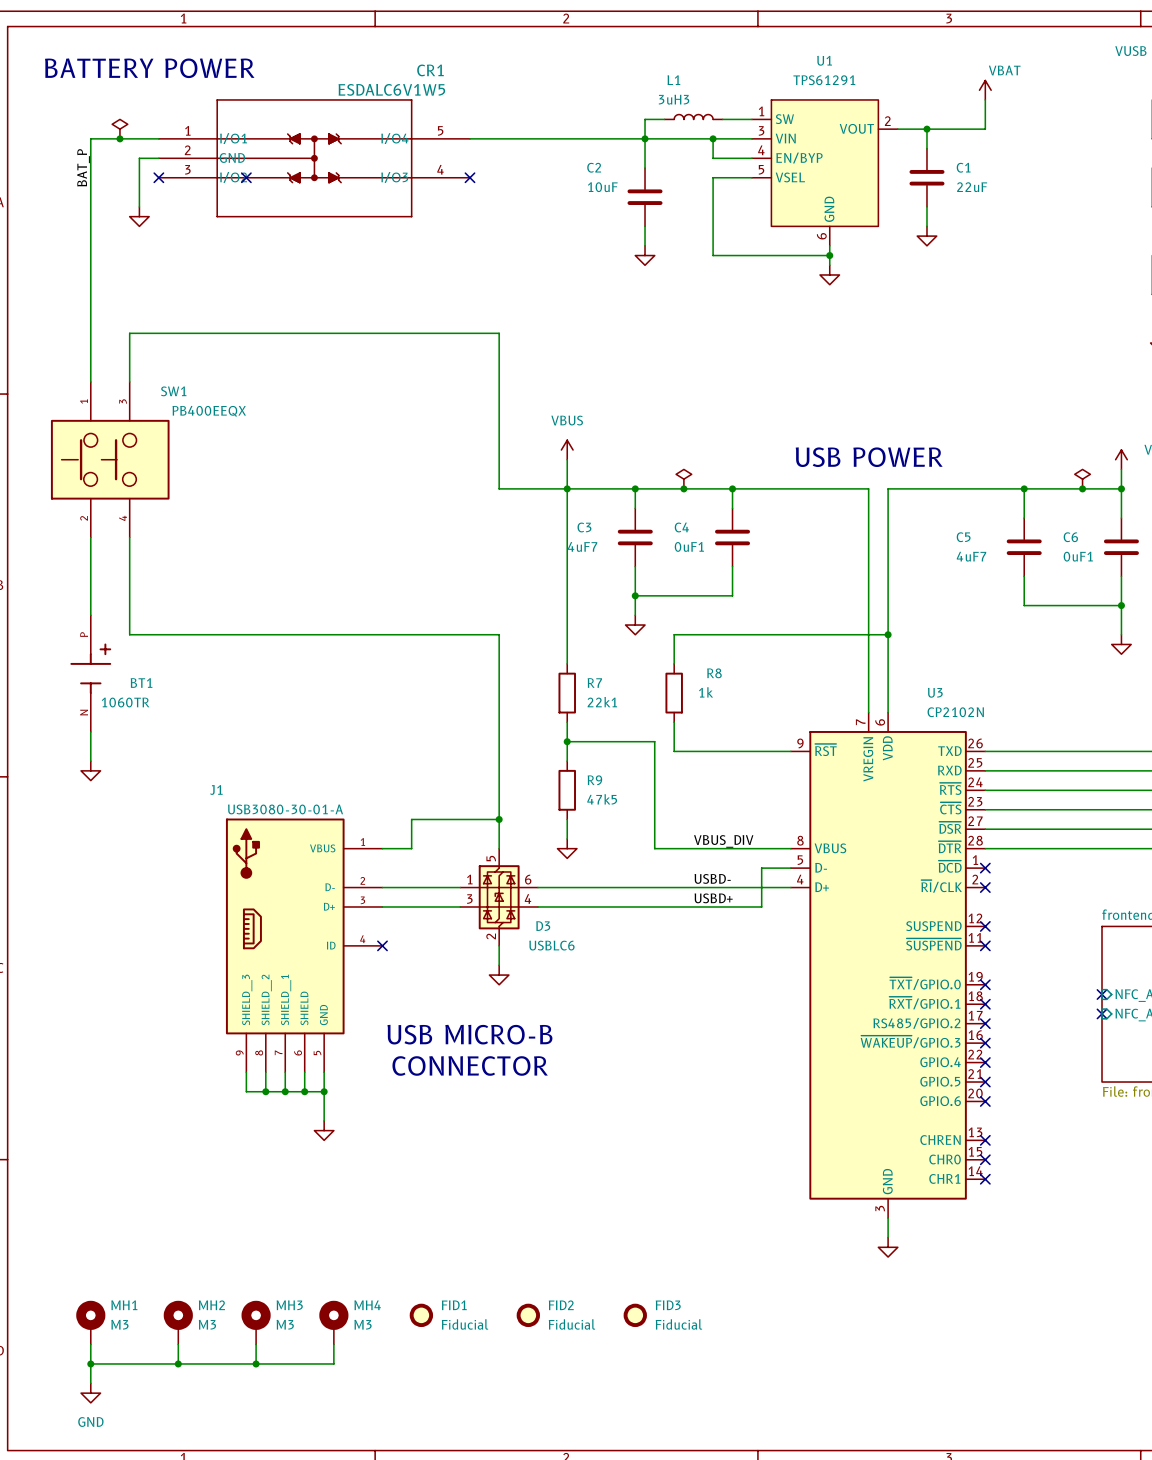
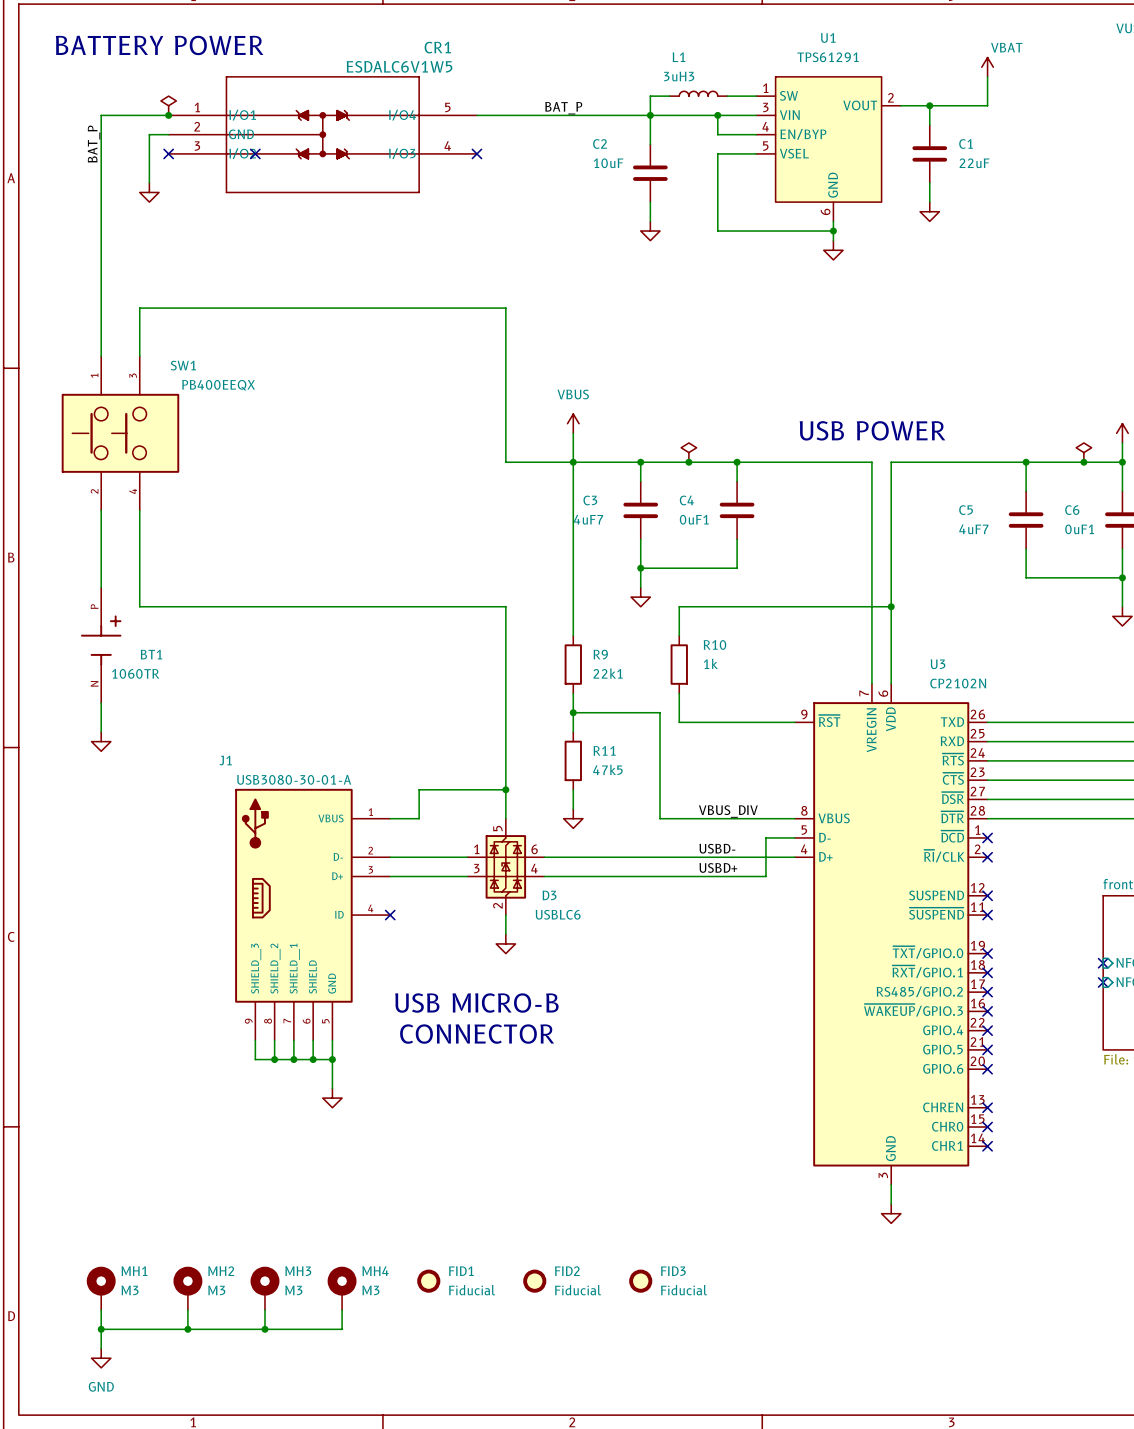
power symbol position: (119, 129) -> (168, 105)
label: none -> BAT_P (563, 108)
junction position: (119, 138) -> (168, 115)
R8 name: R8 (714, 673) -> R10 (714, 644)
R7 name: R7 (594, 683) -> R9 (600, 654)
R9 name: R9 (594, 780) -> R11 (604, 750)

